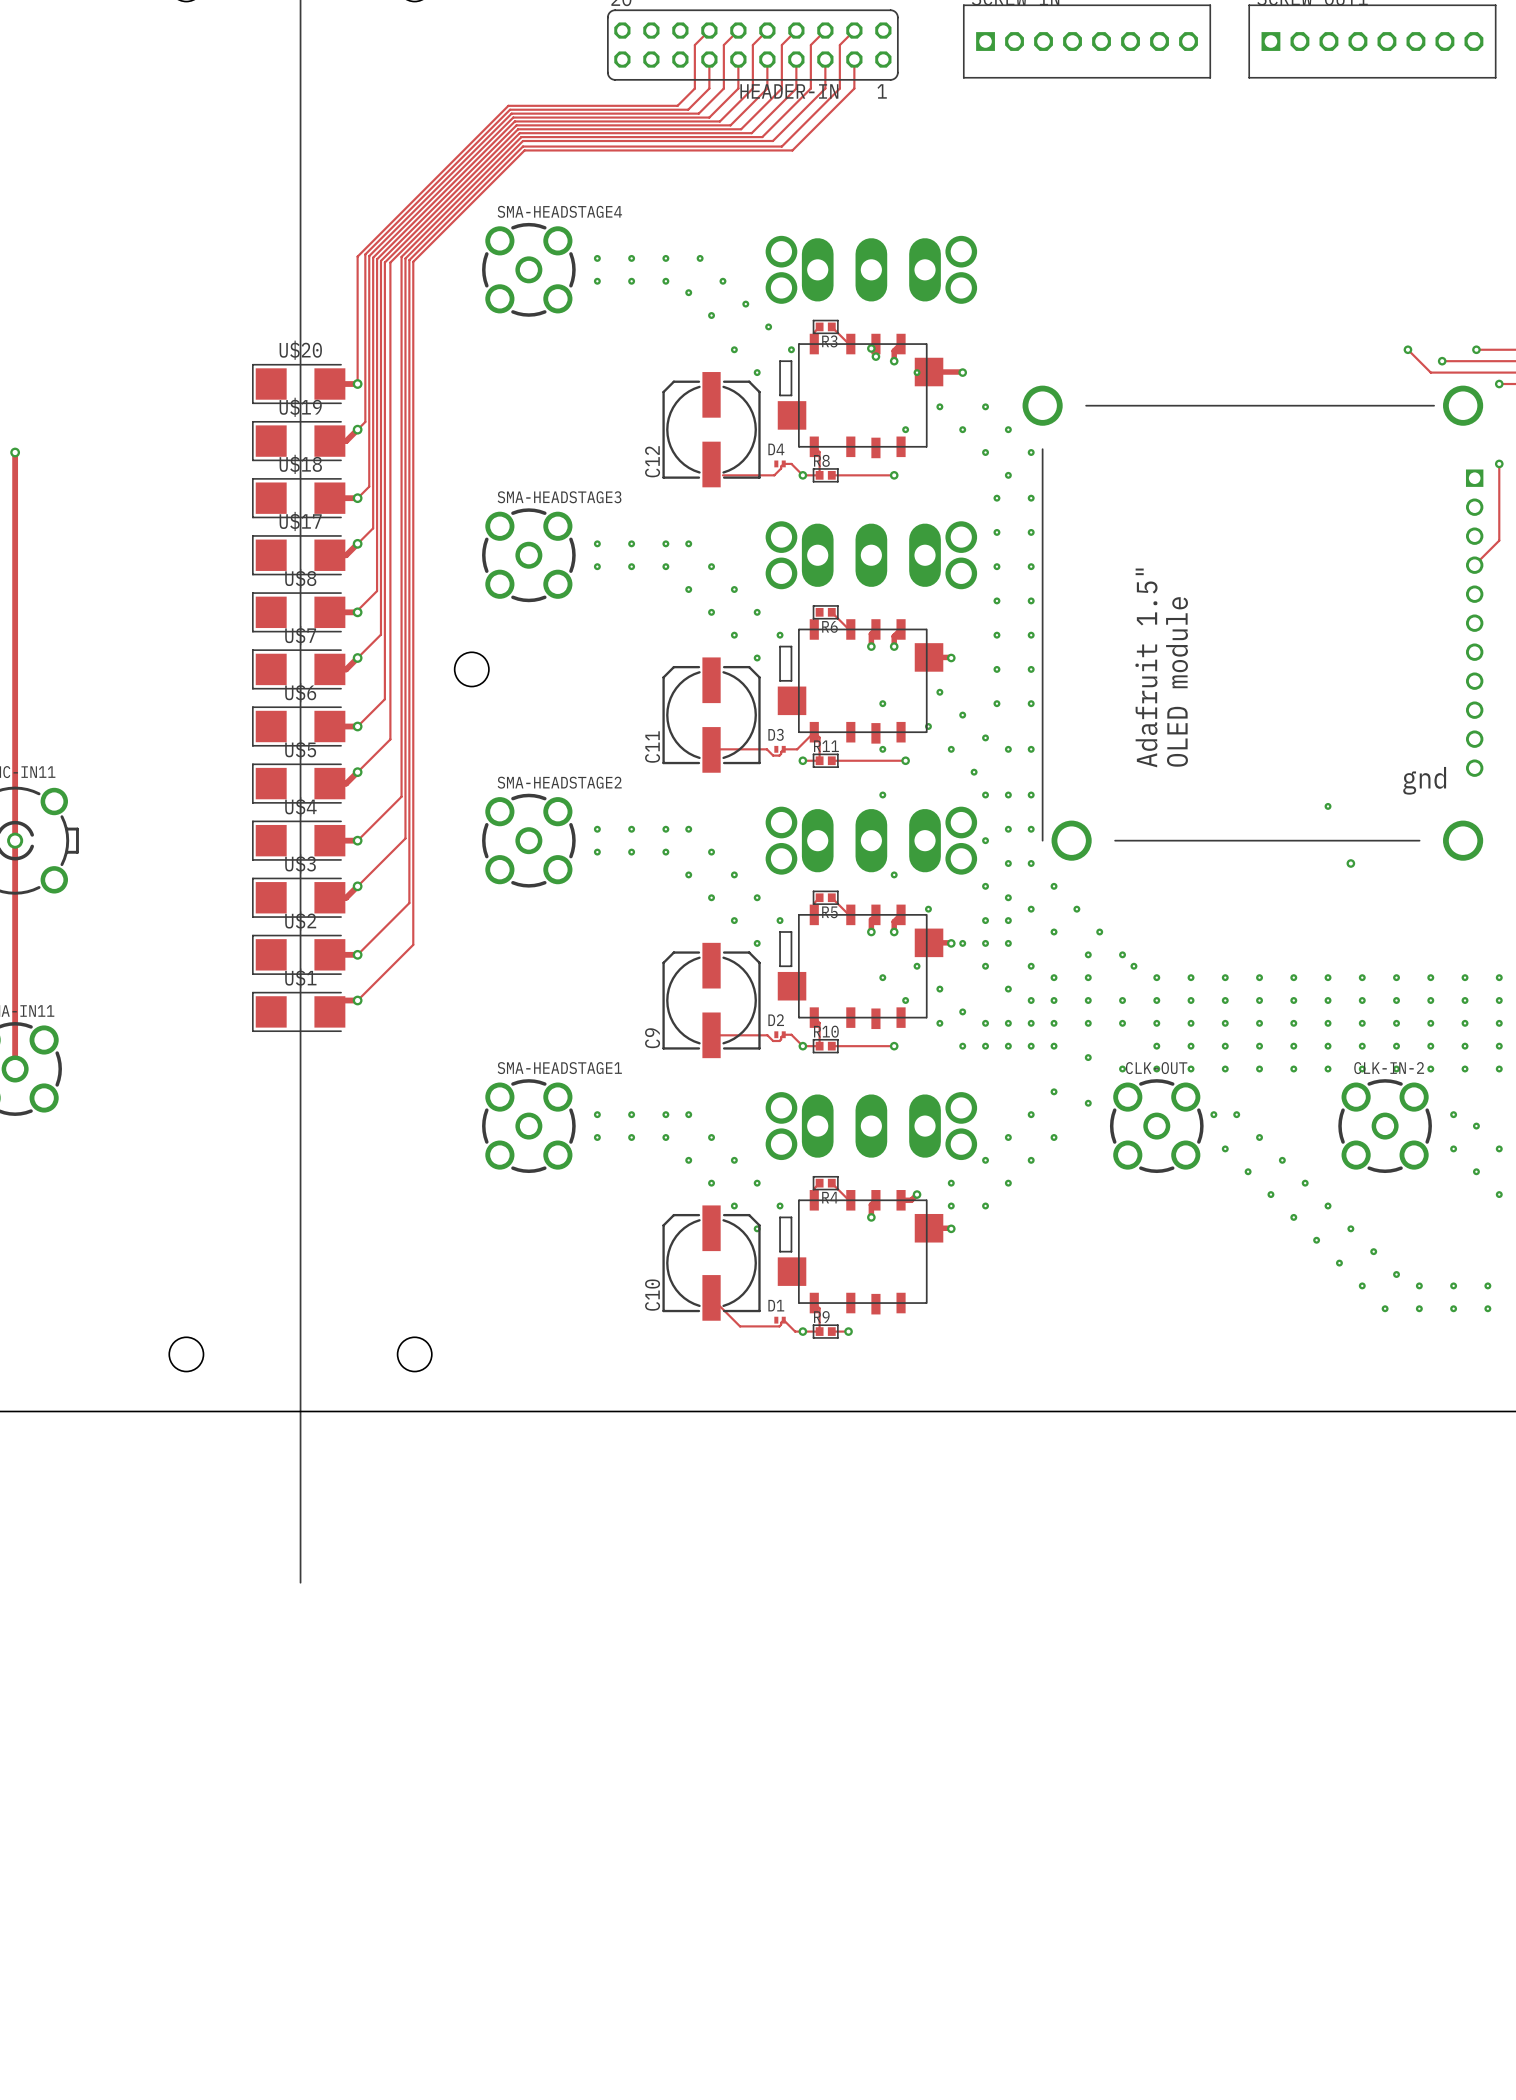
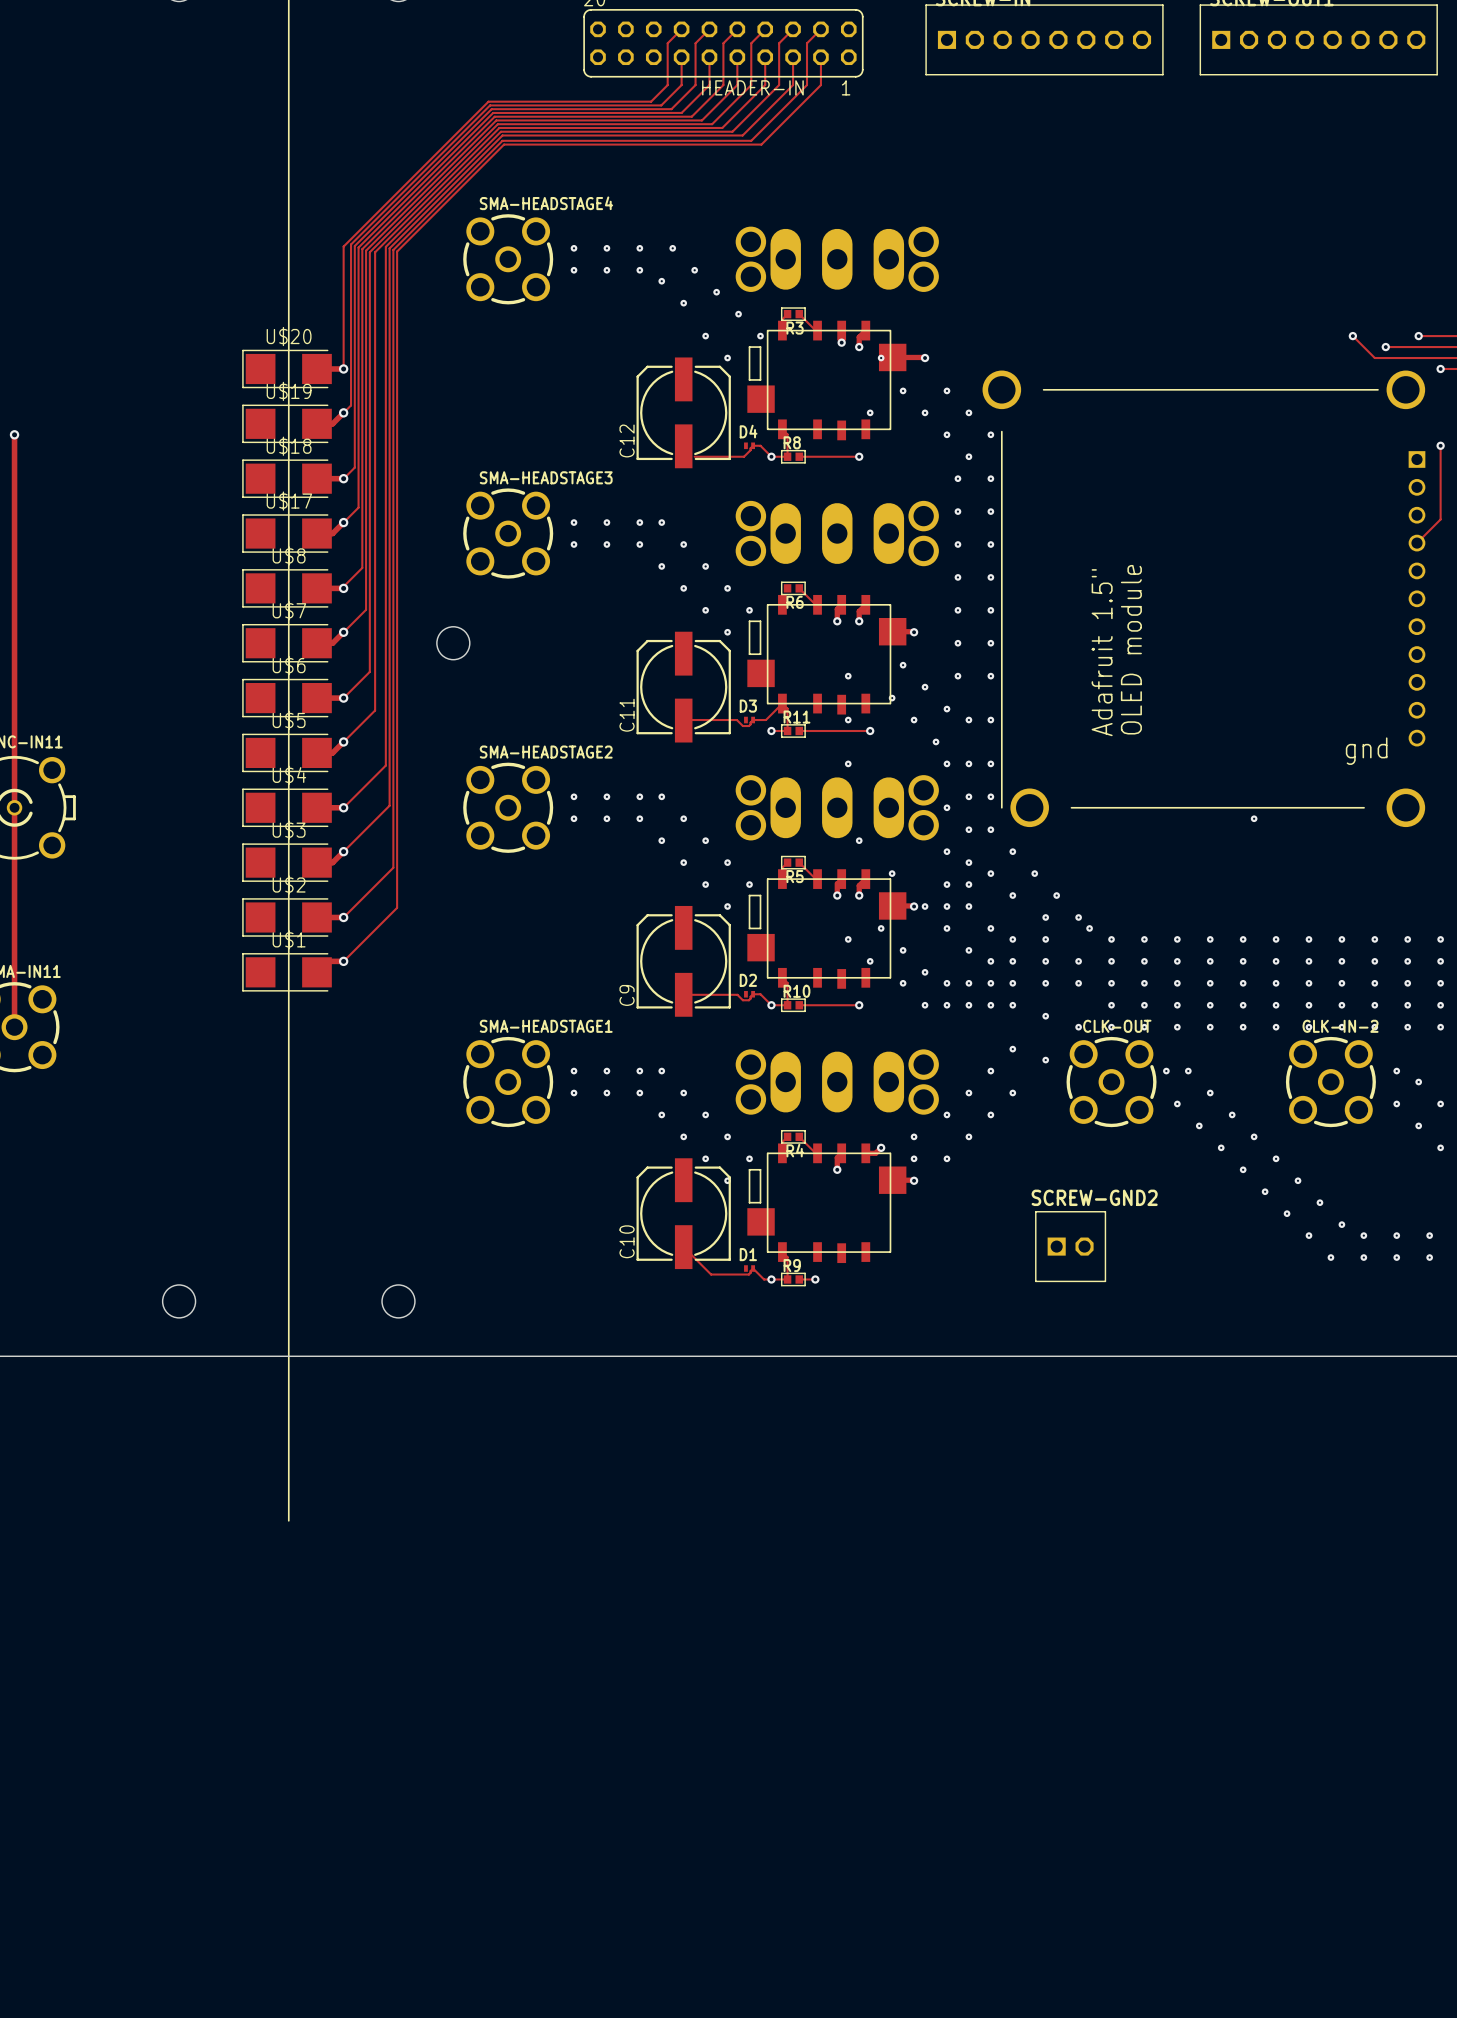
via: (871, 348) -> none
via position: (1328, 806) -> (1254, 818)
via: (1350, 863) -> none
SCREW-GND2: none -> (1070, 1246)

